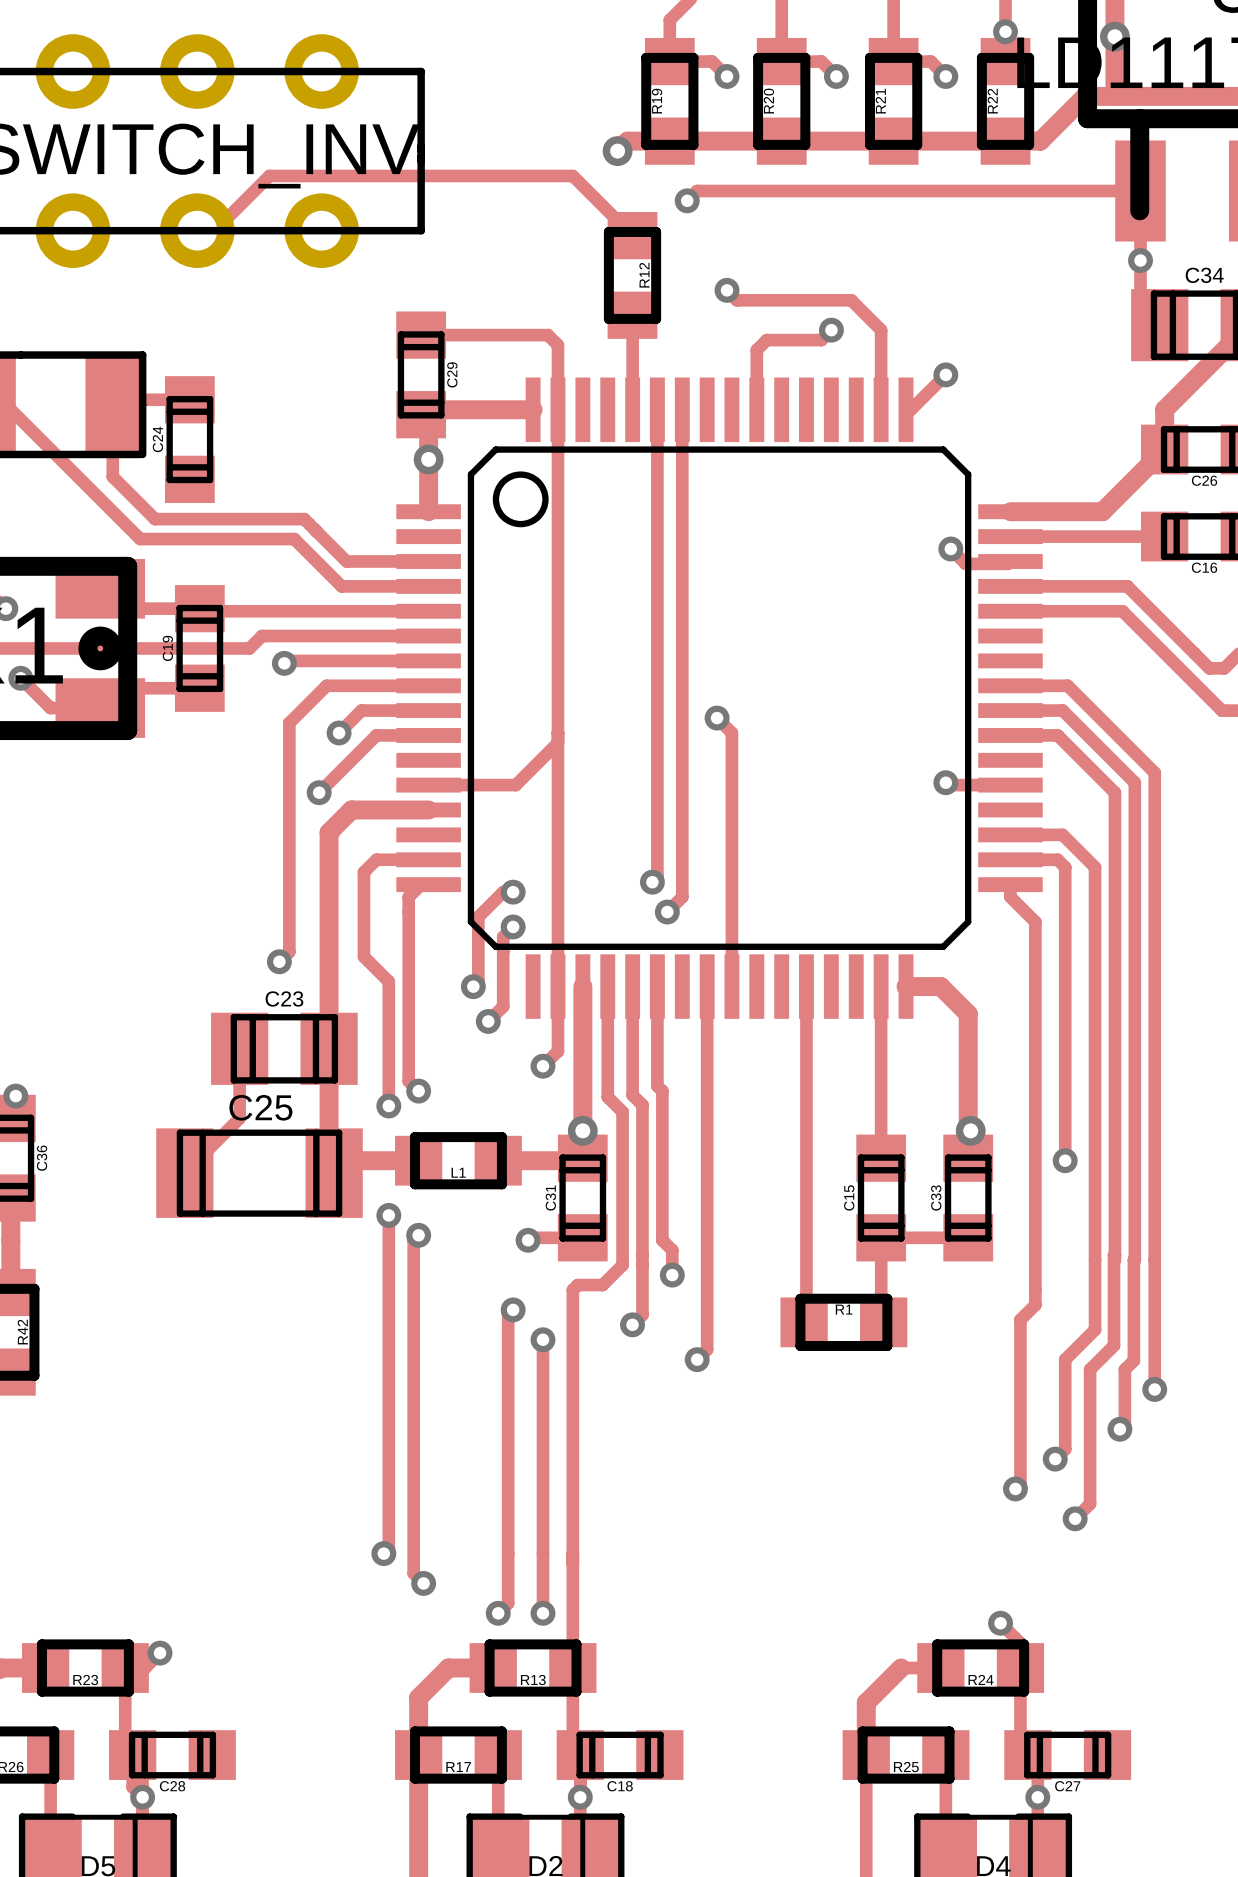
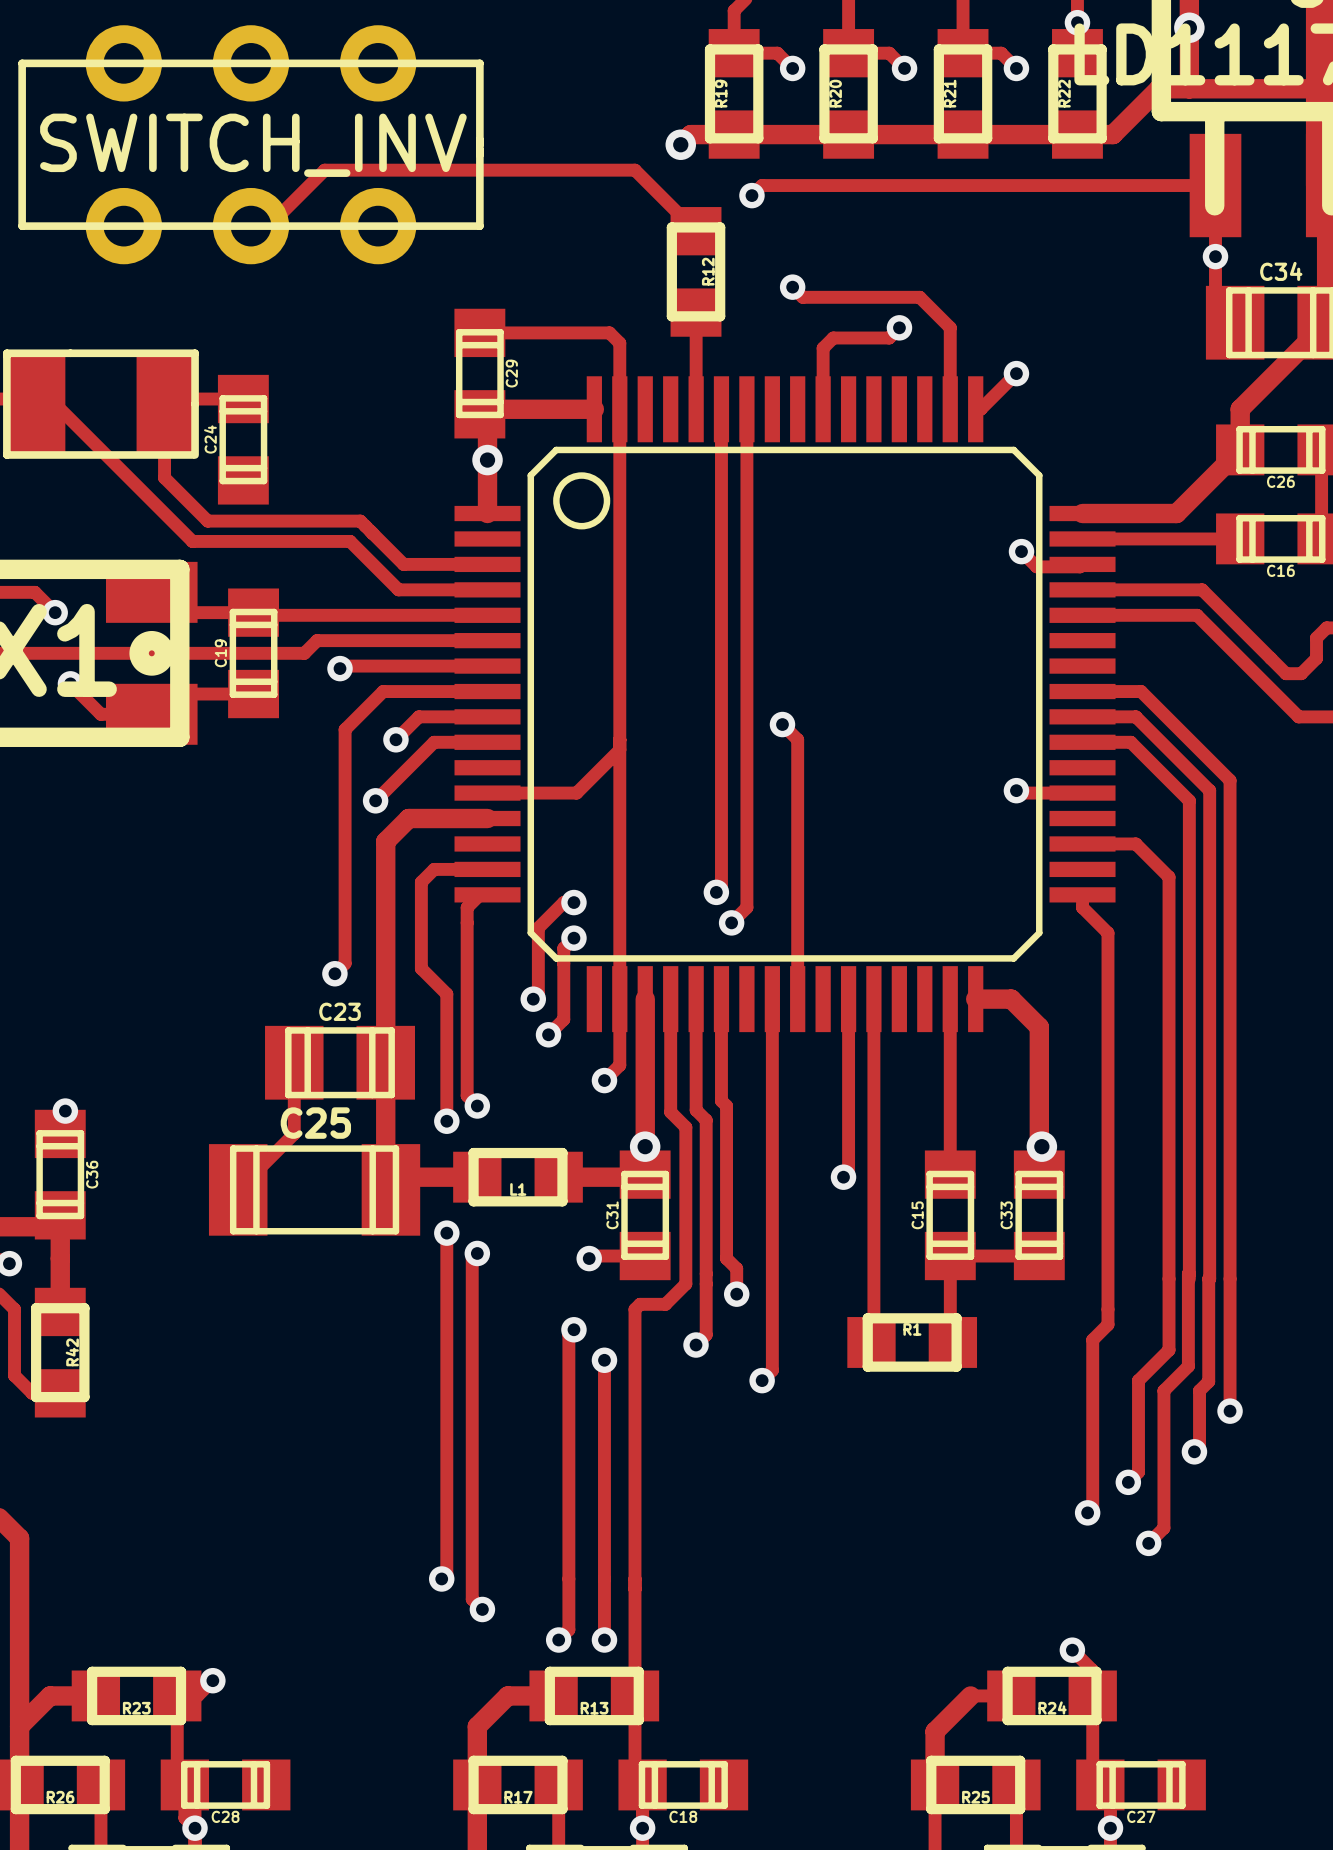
track: (1010, 859) (1057, 859) (1065, 867) (1065, 1160) -> none
track: none -> (848, 999) (848, 1172) (843, 1177)
via position: (1065, 1160) -> (843, 1177)

